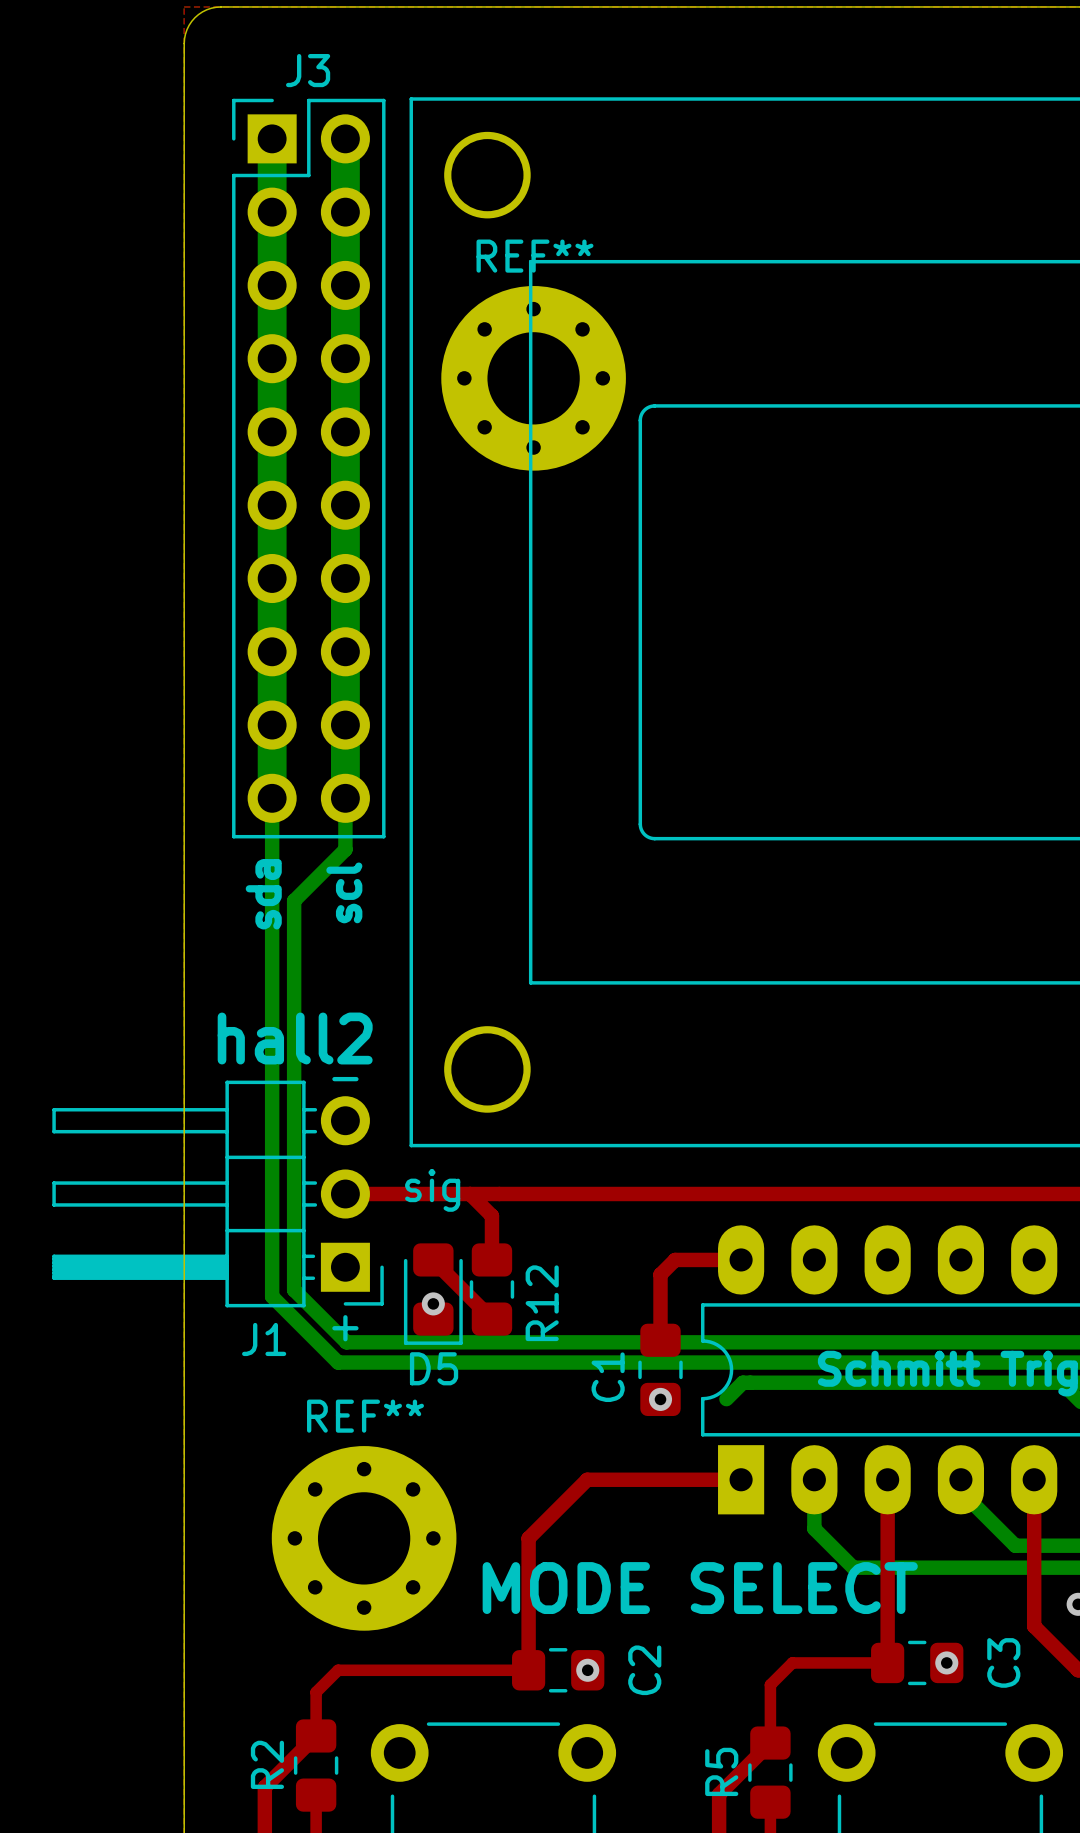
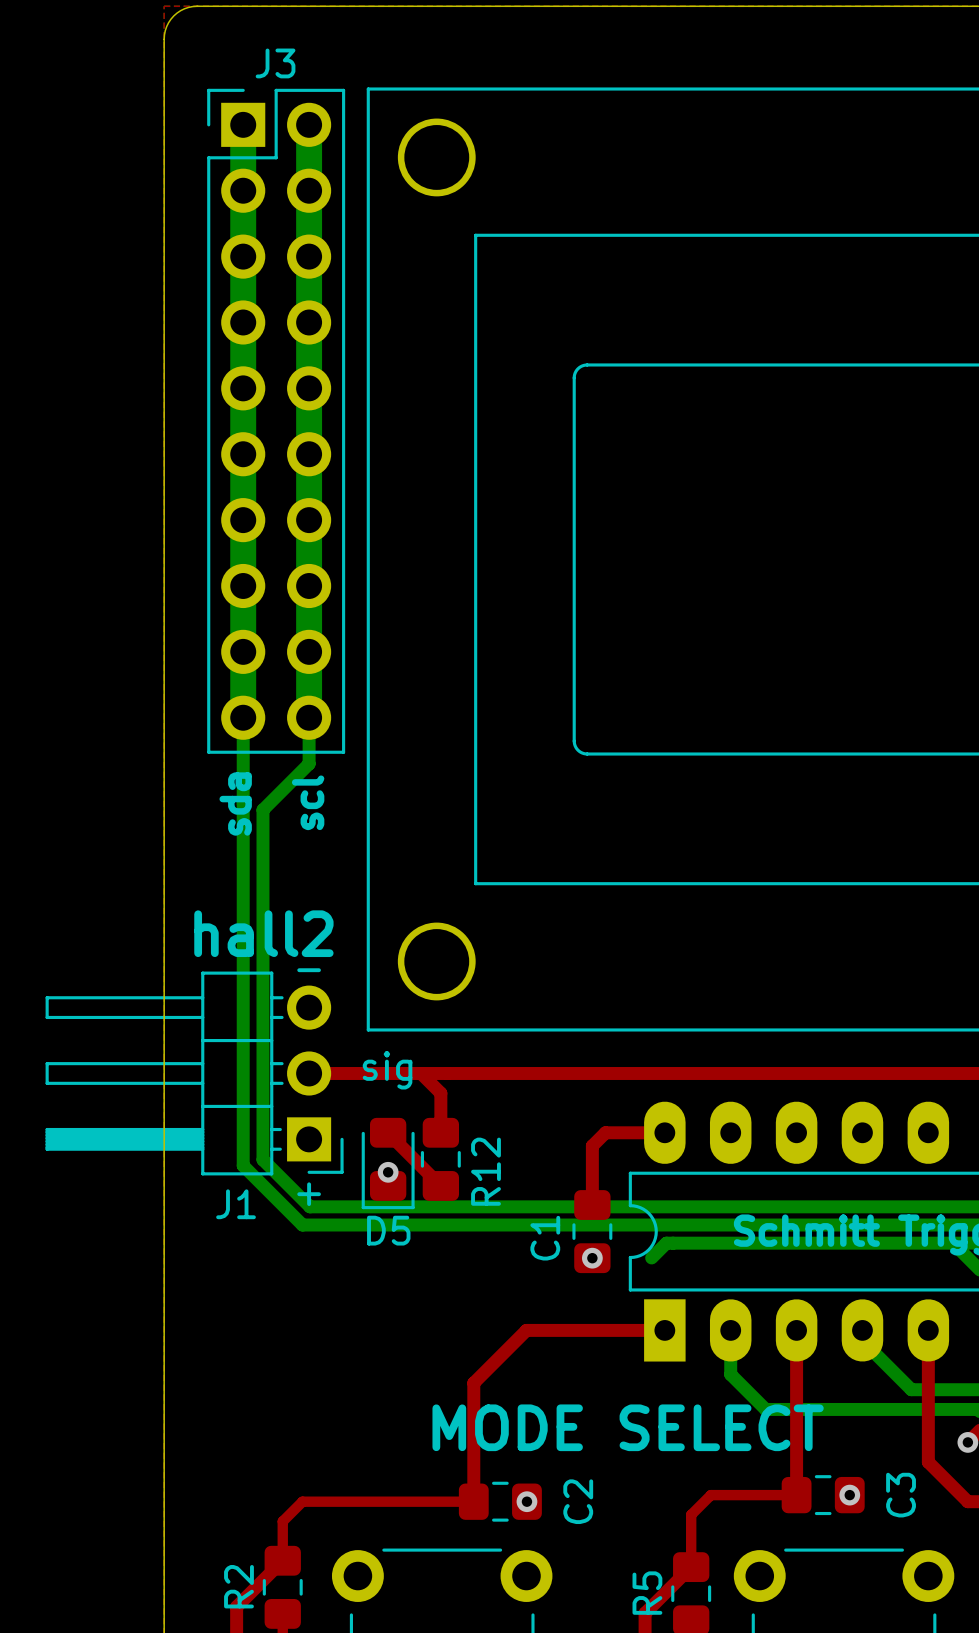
REF**: (533, 378) -> none
REF**: (364, 1538) -> none

